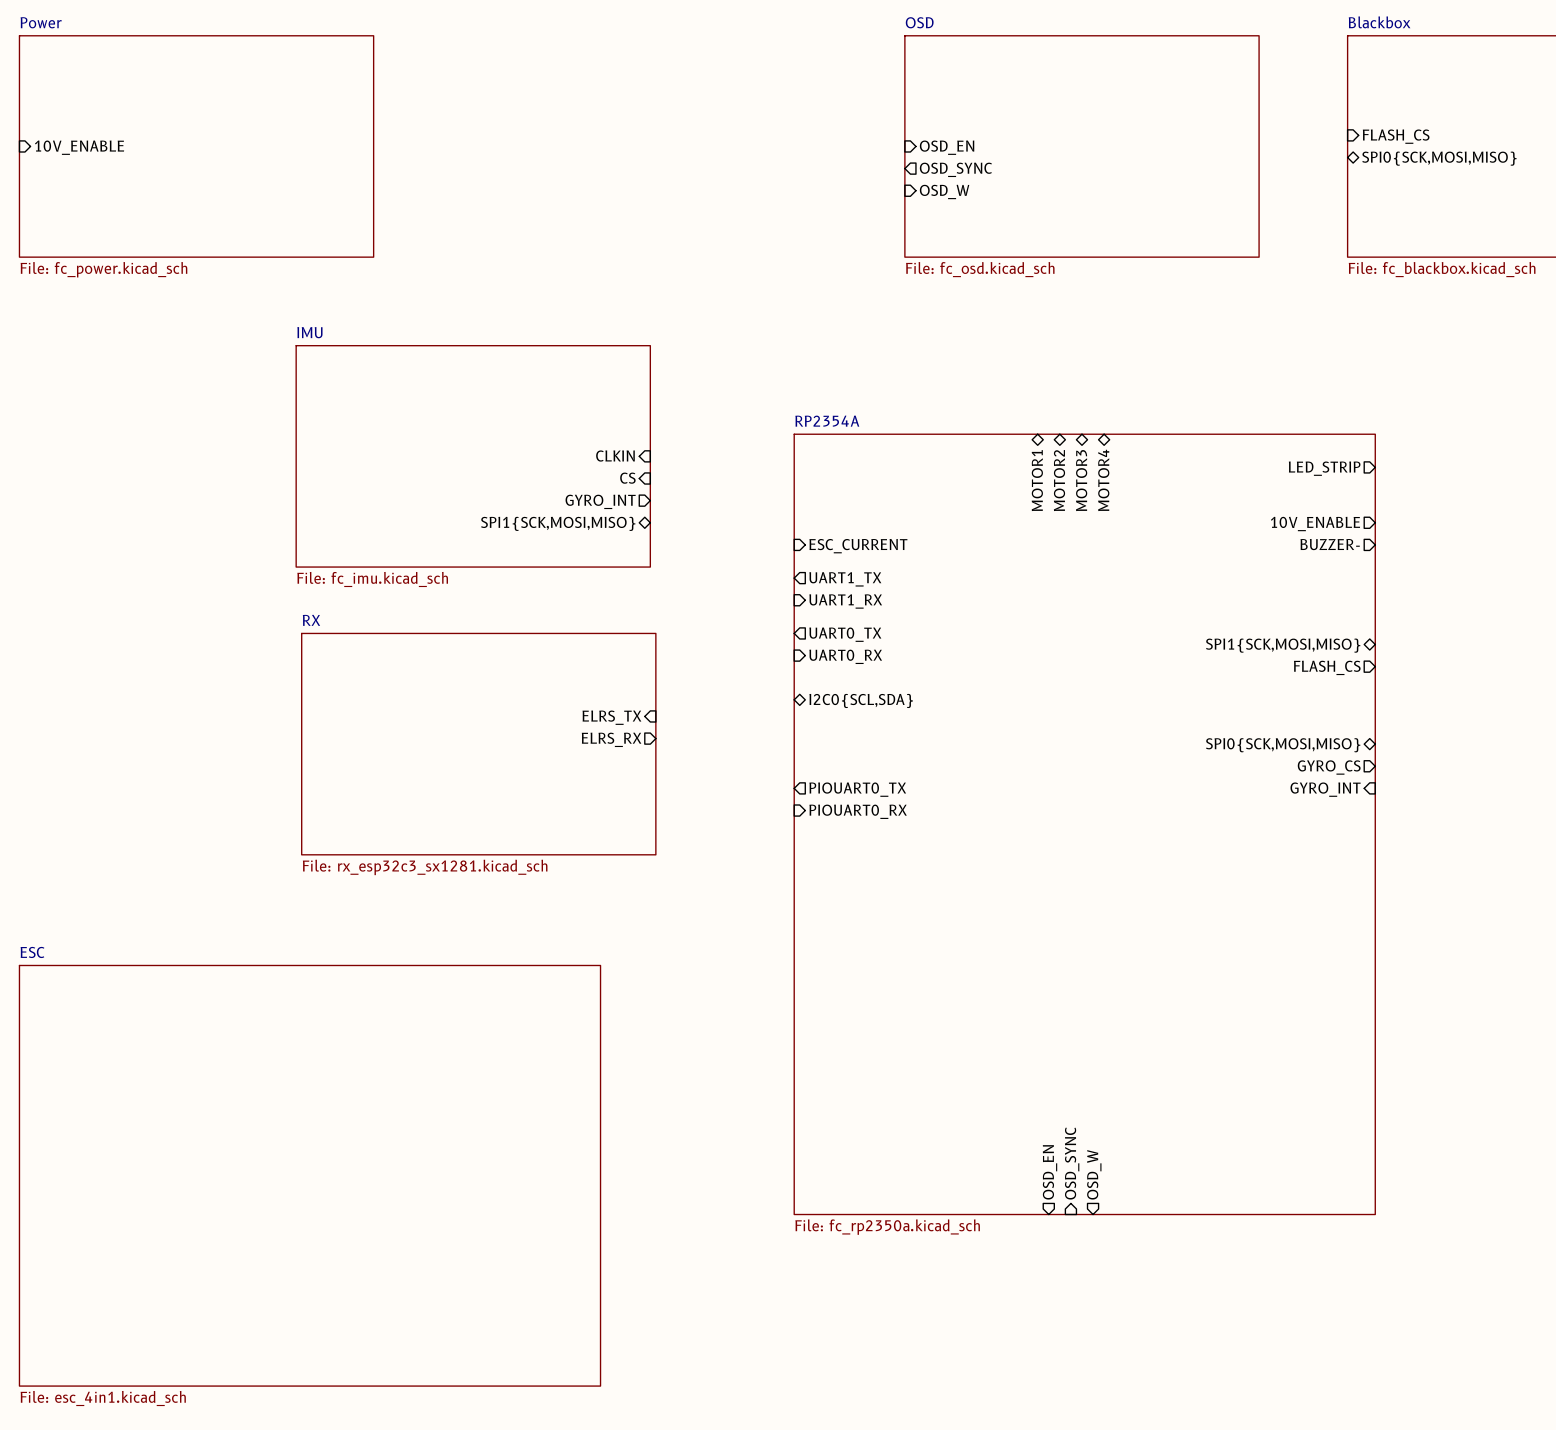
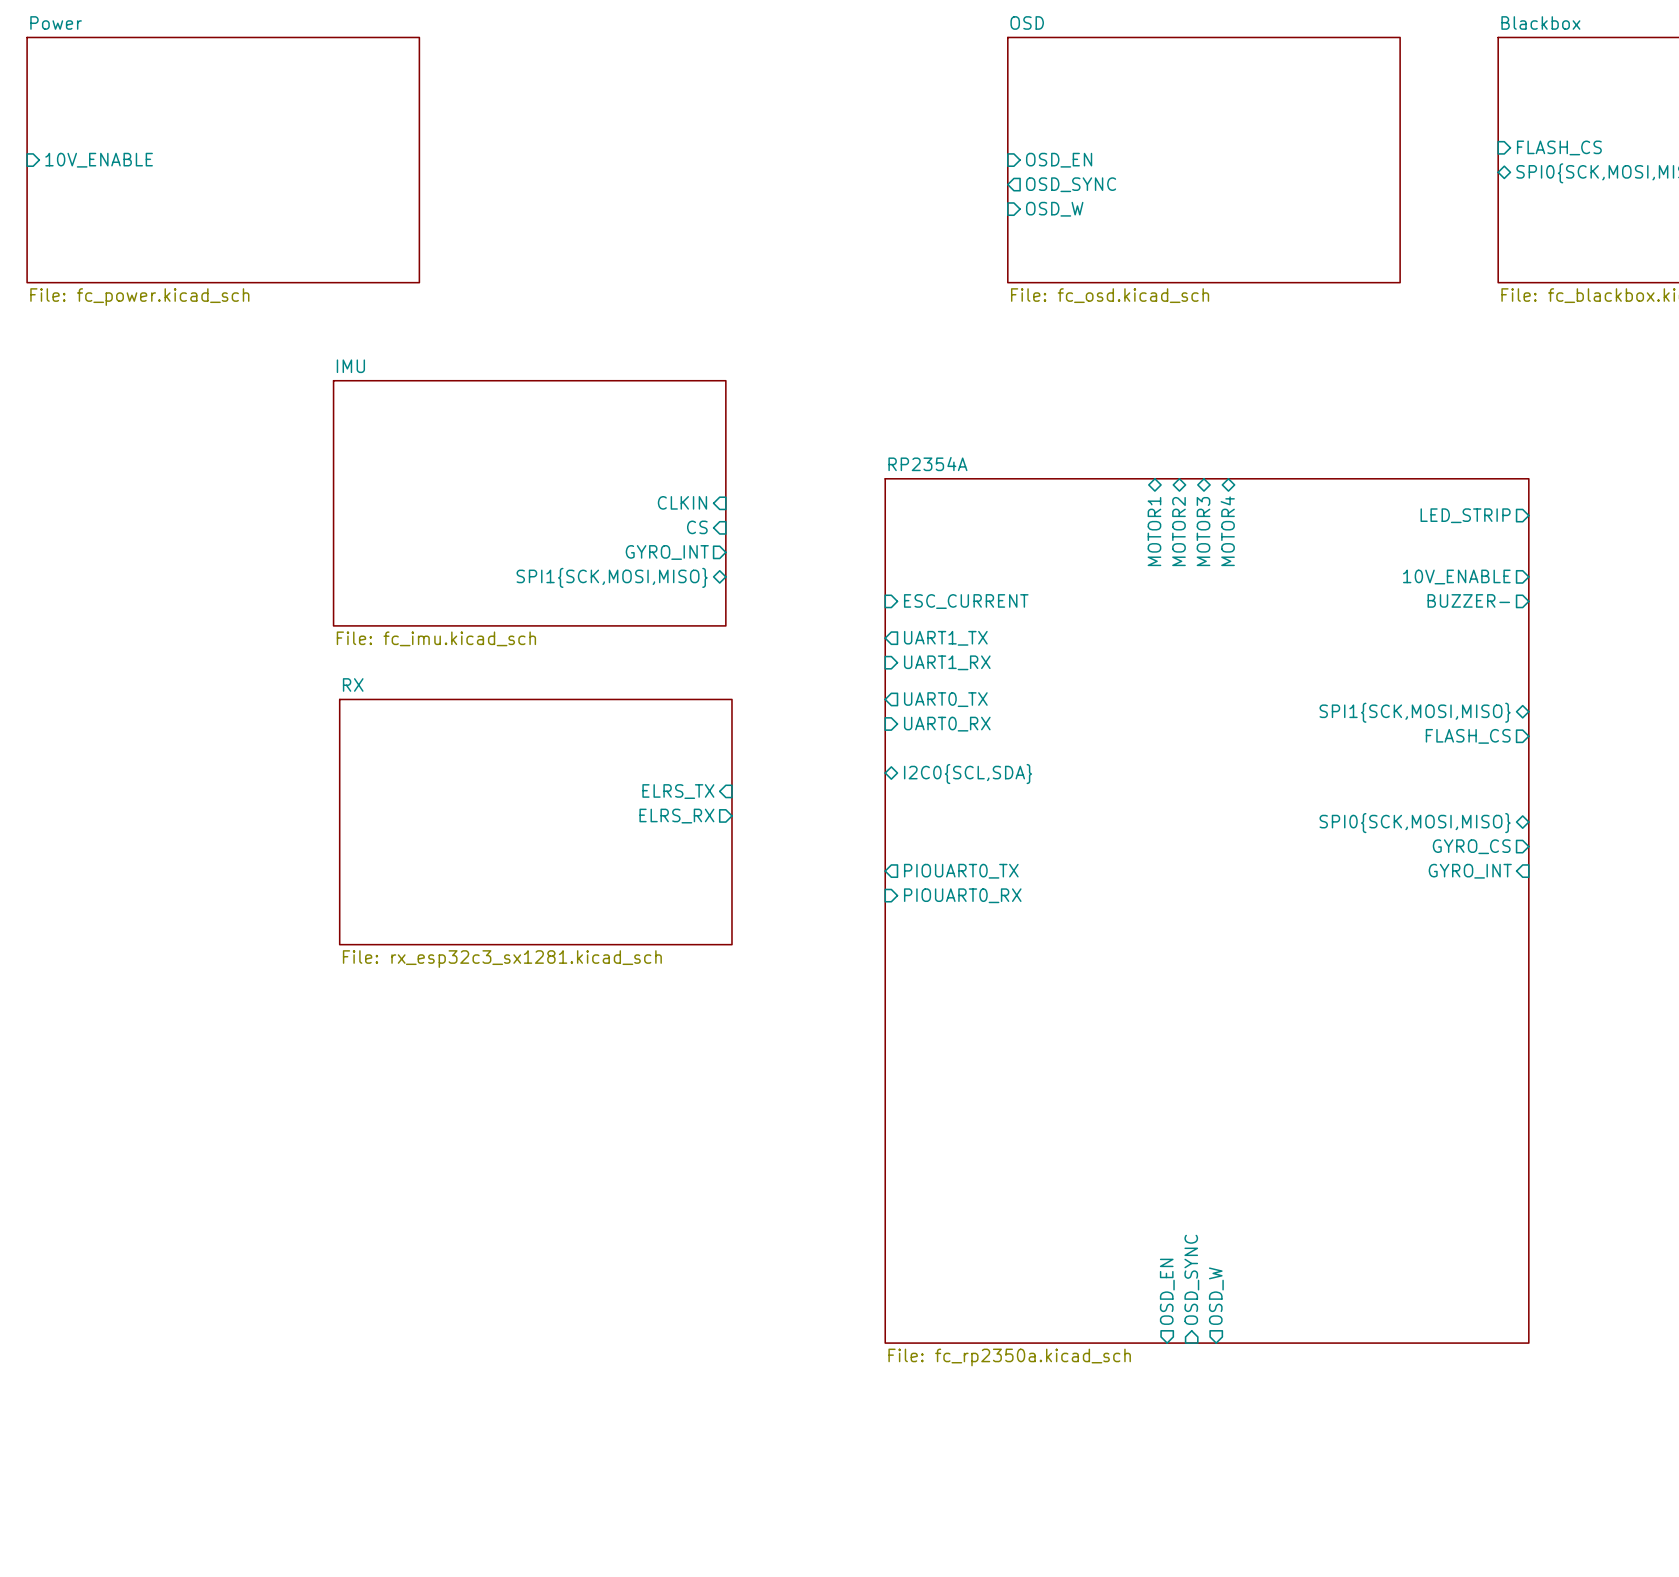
sheet ESC: File: esc_4in1.kicad_sch (309, 1175) -> none

